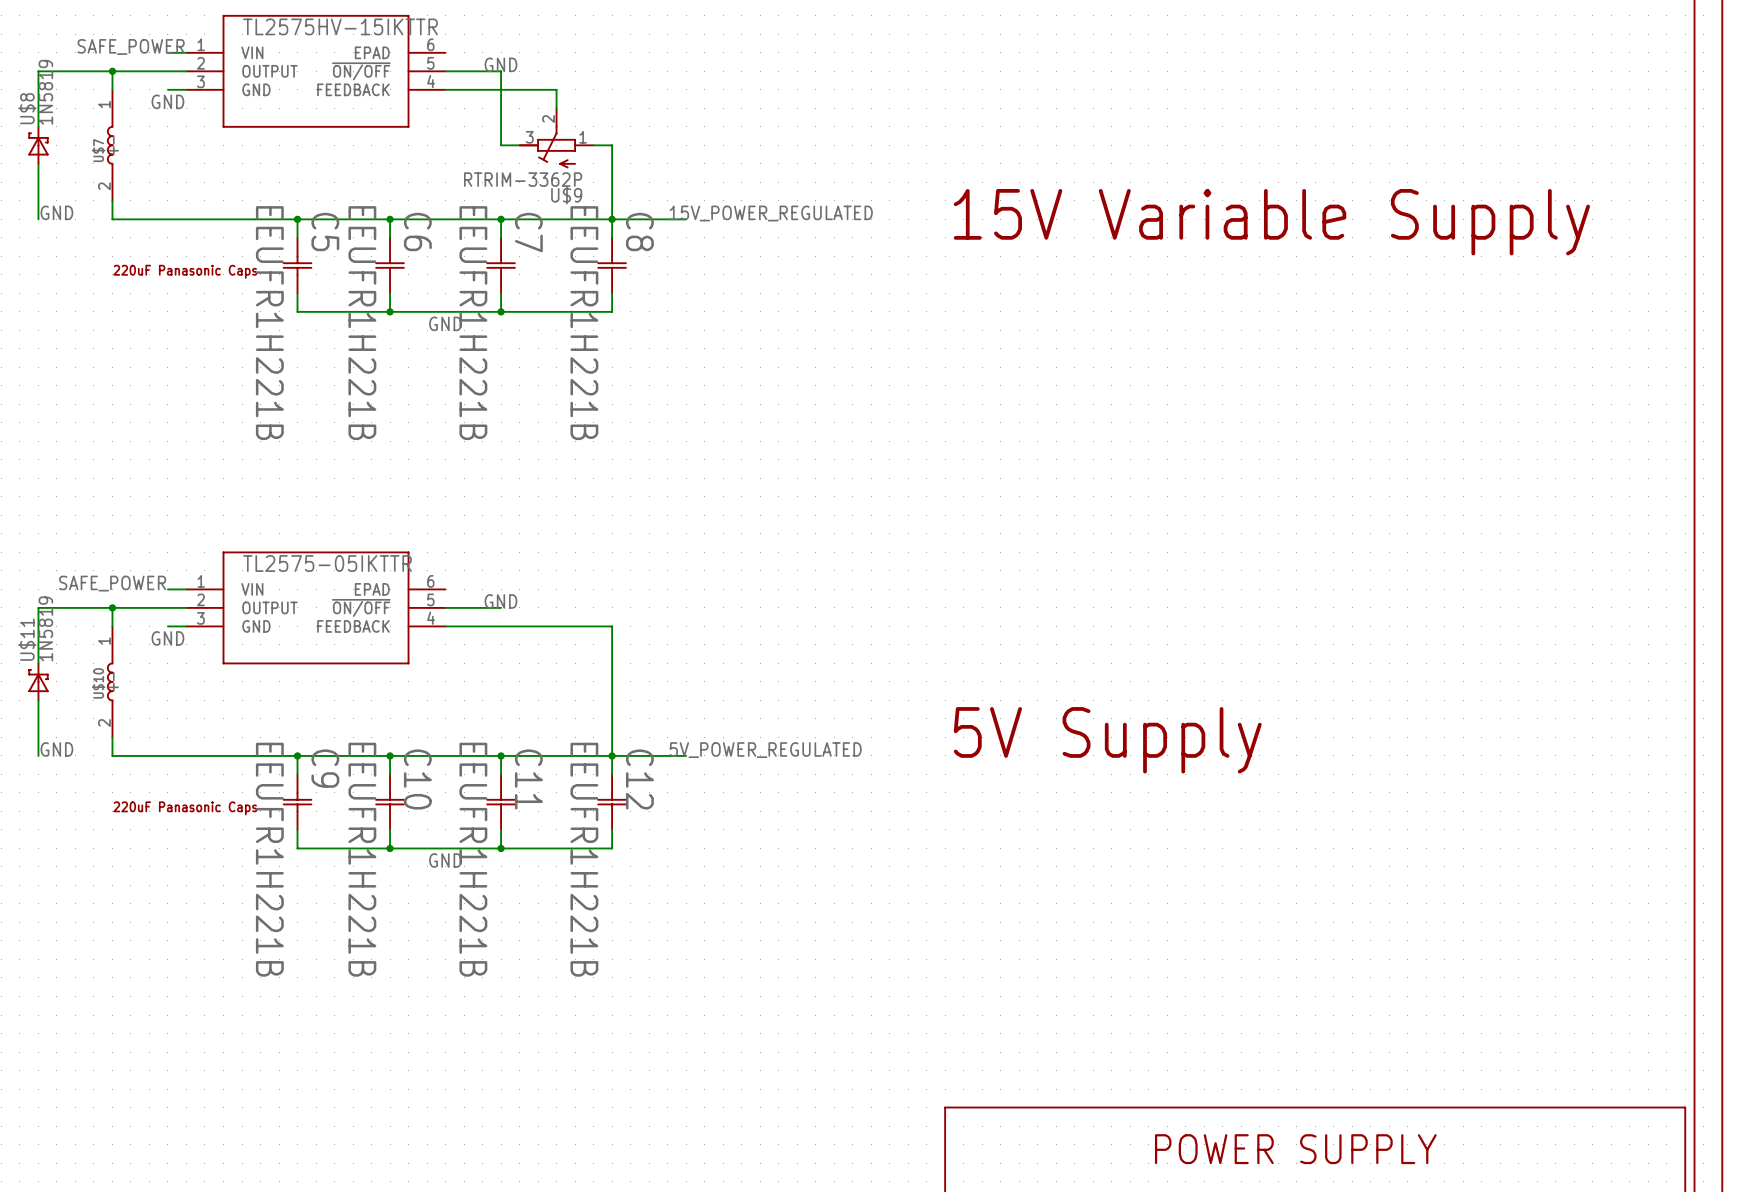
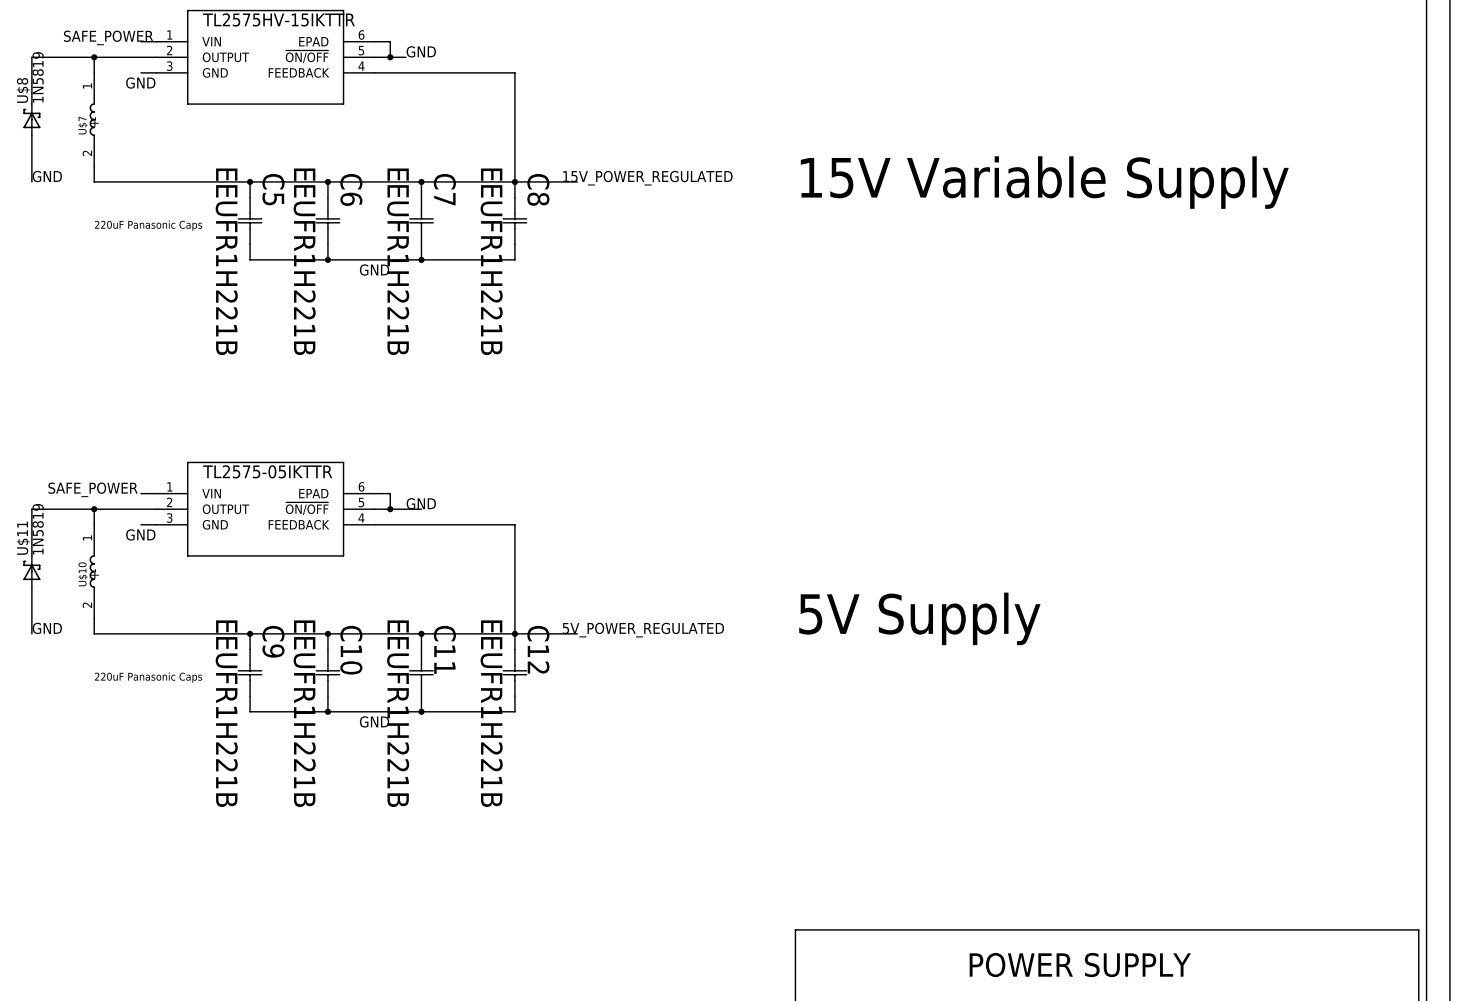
wire: none -> (374, 41) (390, 41) (390, 57)
junction: none -> (390, 57)
wire: (482, 71) (501, 71) (501, 145) (519, 145) -> none
wire: (556, 89) (556, 108) -> none
U$9: RTRIM-3362P (556, 138) -> none
wire: (593, 145) (612, 145) -> (468, 72) (514, 72) (514, 119)
wire: none -> (374, 493) (390, 493) (390, 509)
junction: none -> (390, 509)

